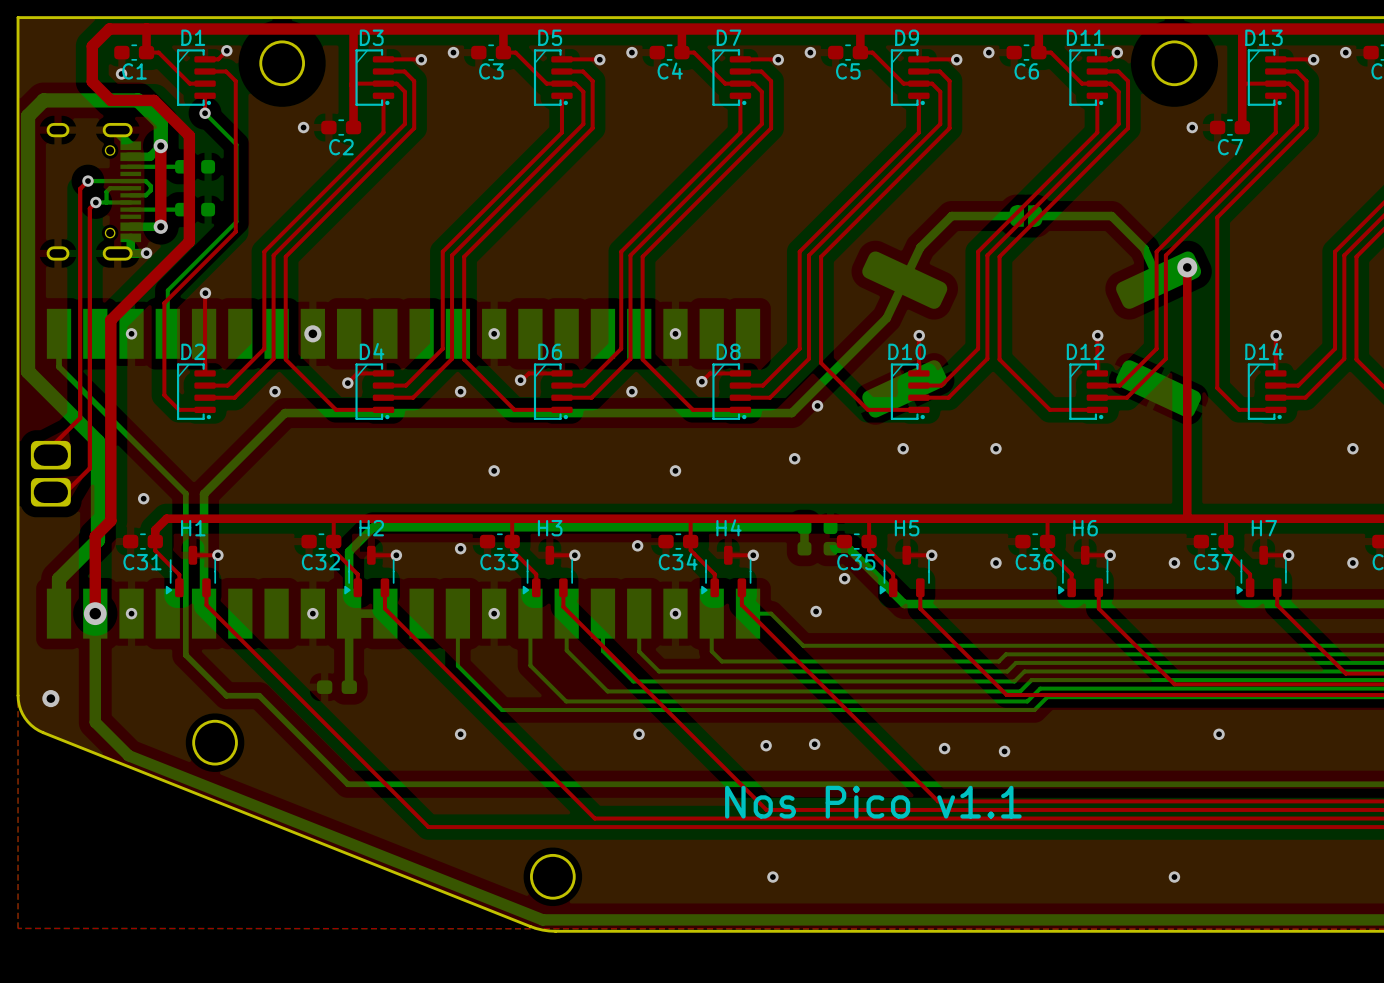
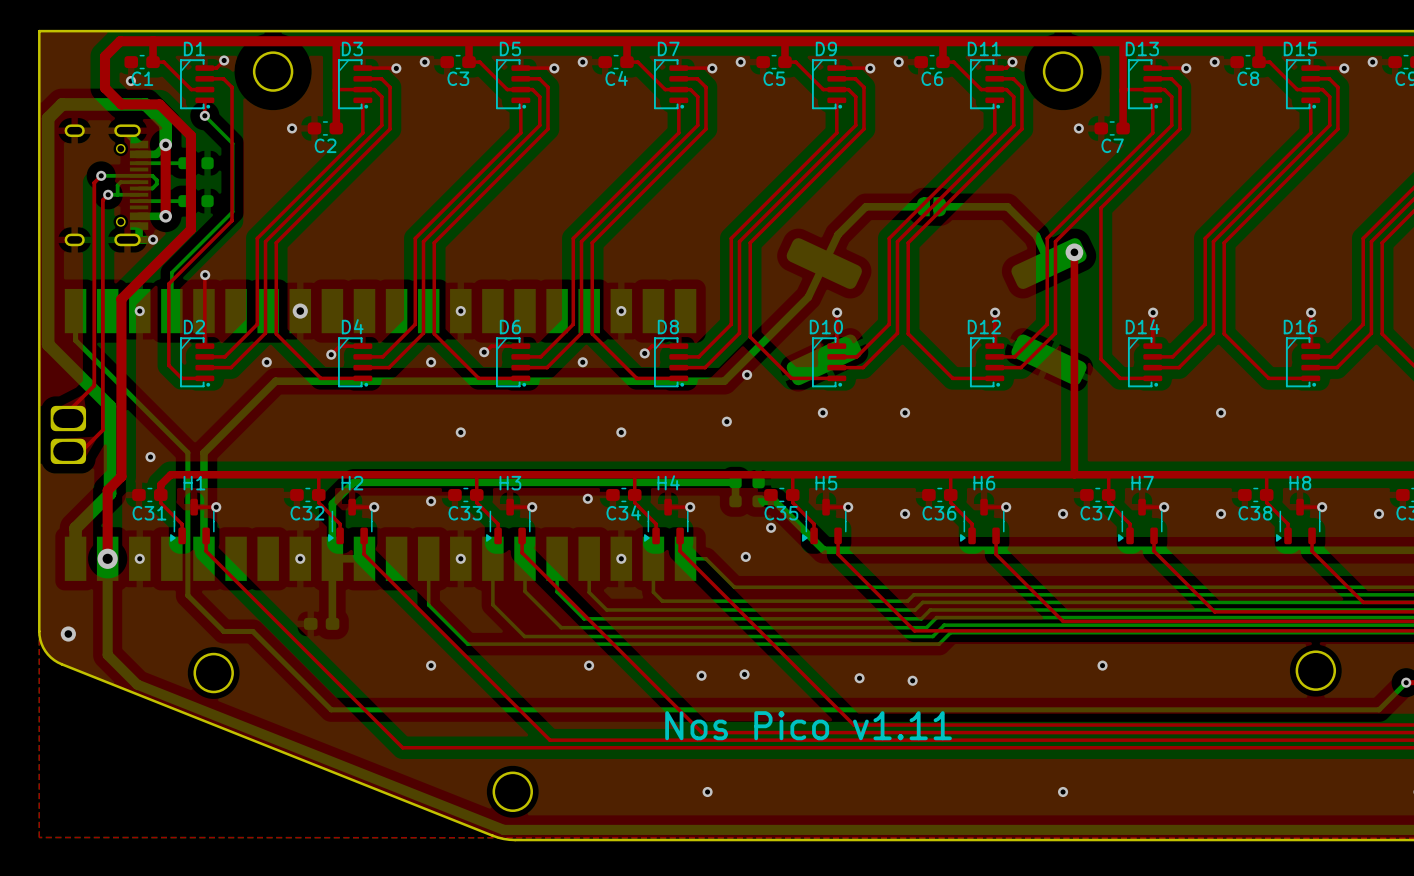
text: Nos Pico v1.1 (873, 802) -> Nos Pico v1.11 (808, 725)

